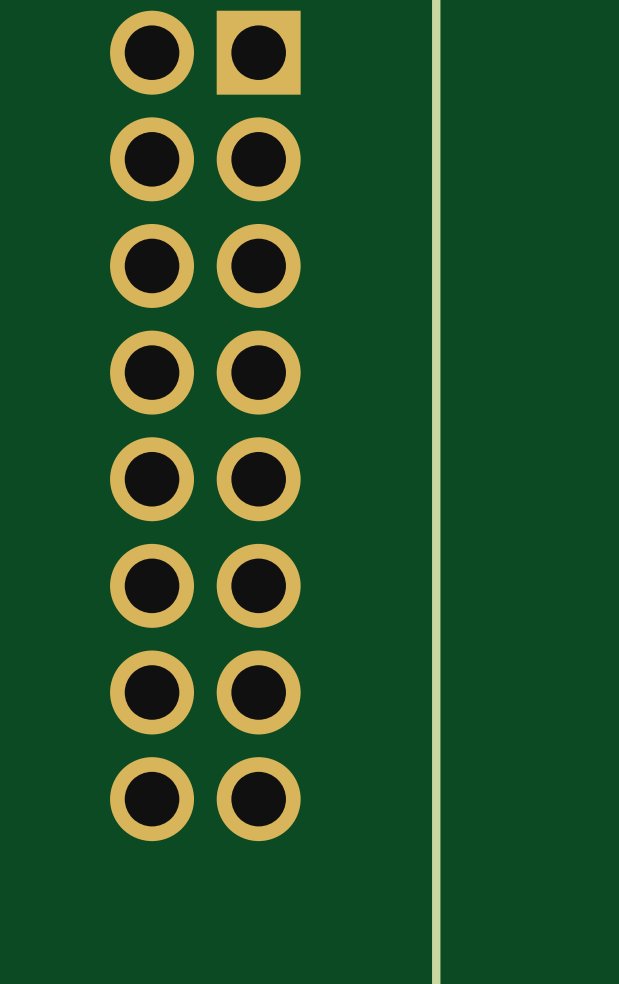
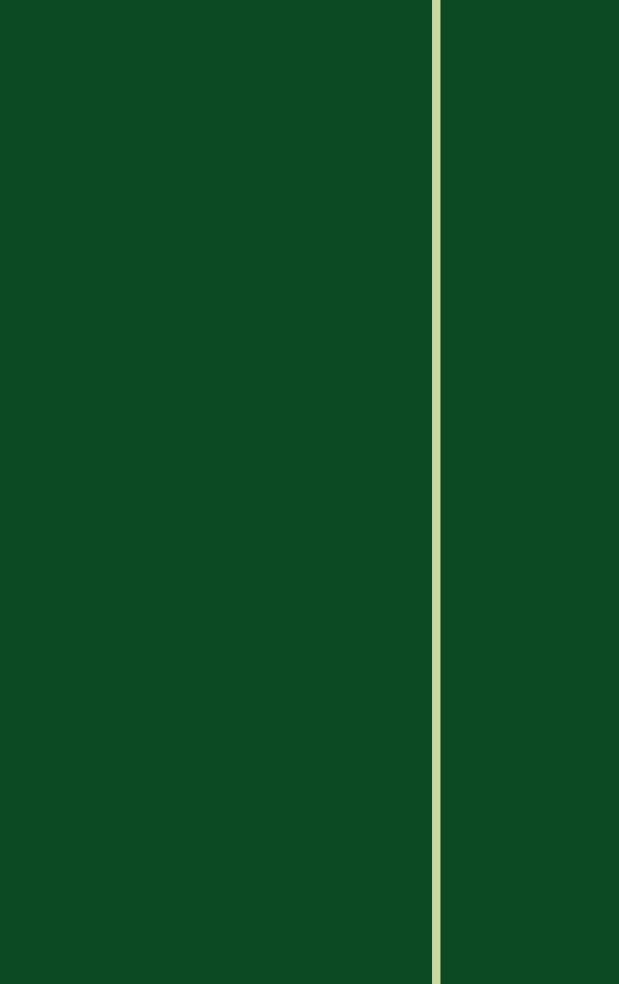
part: (205, 425) -> none

